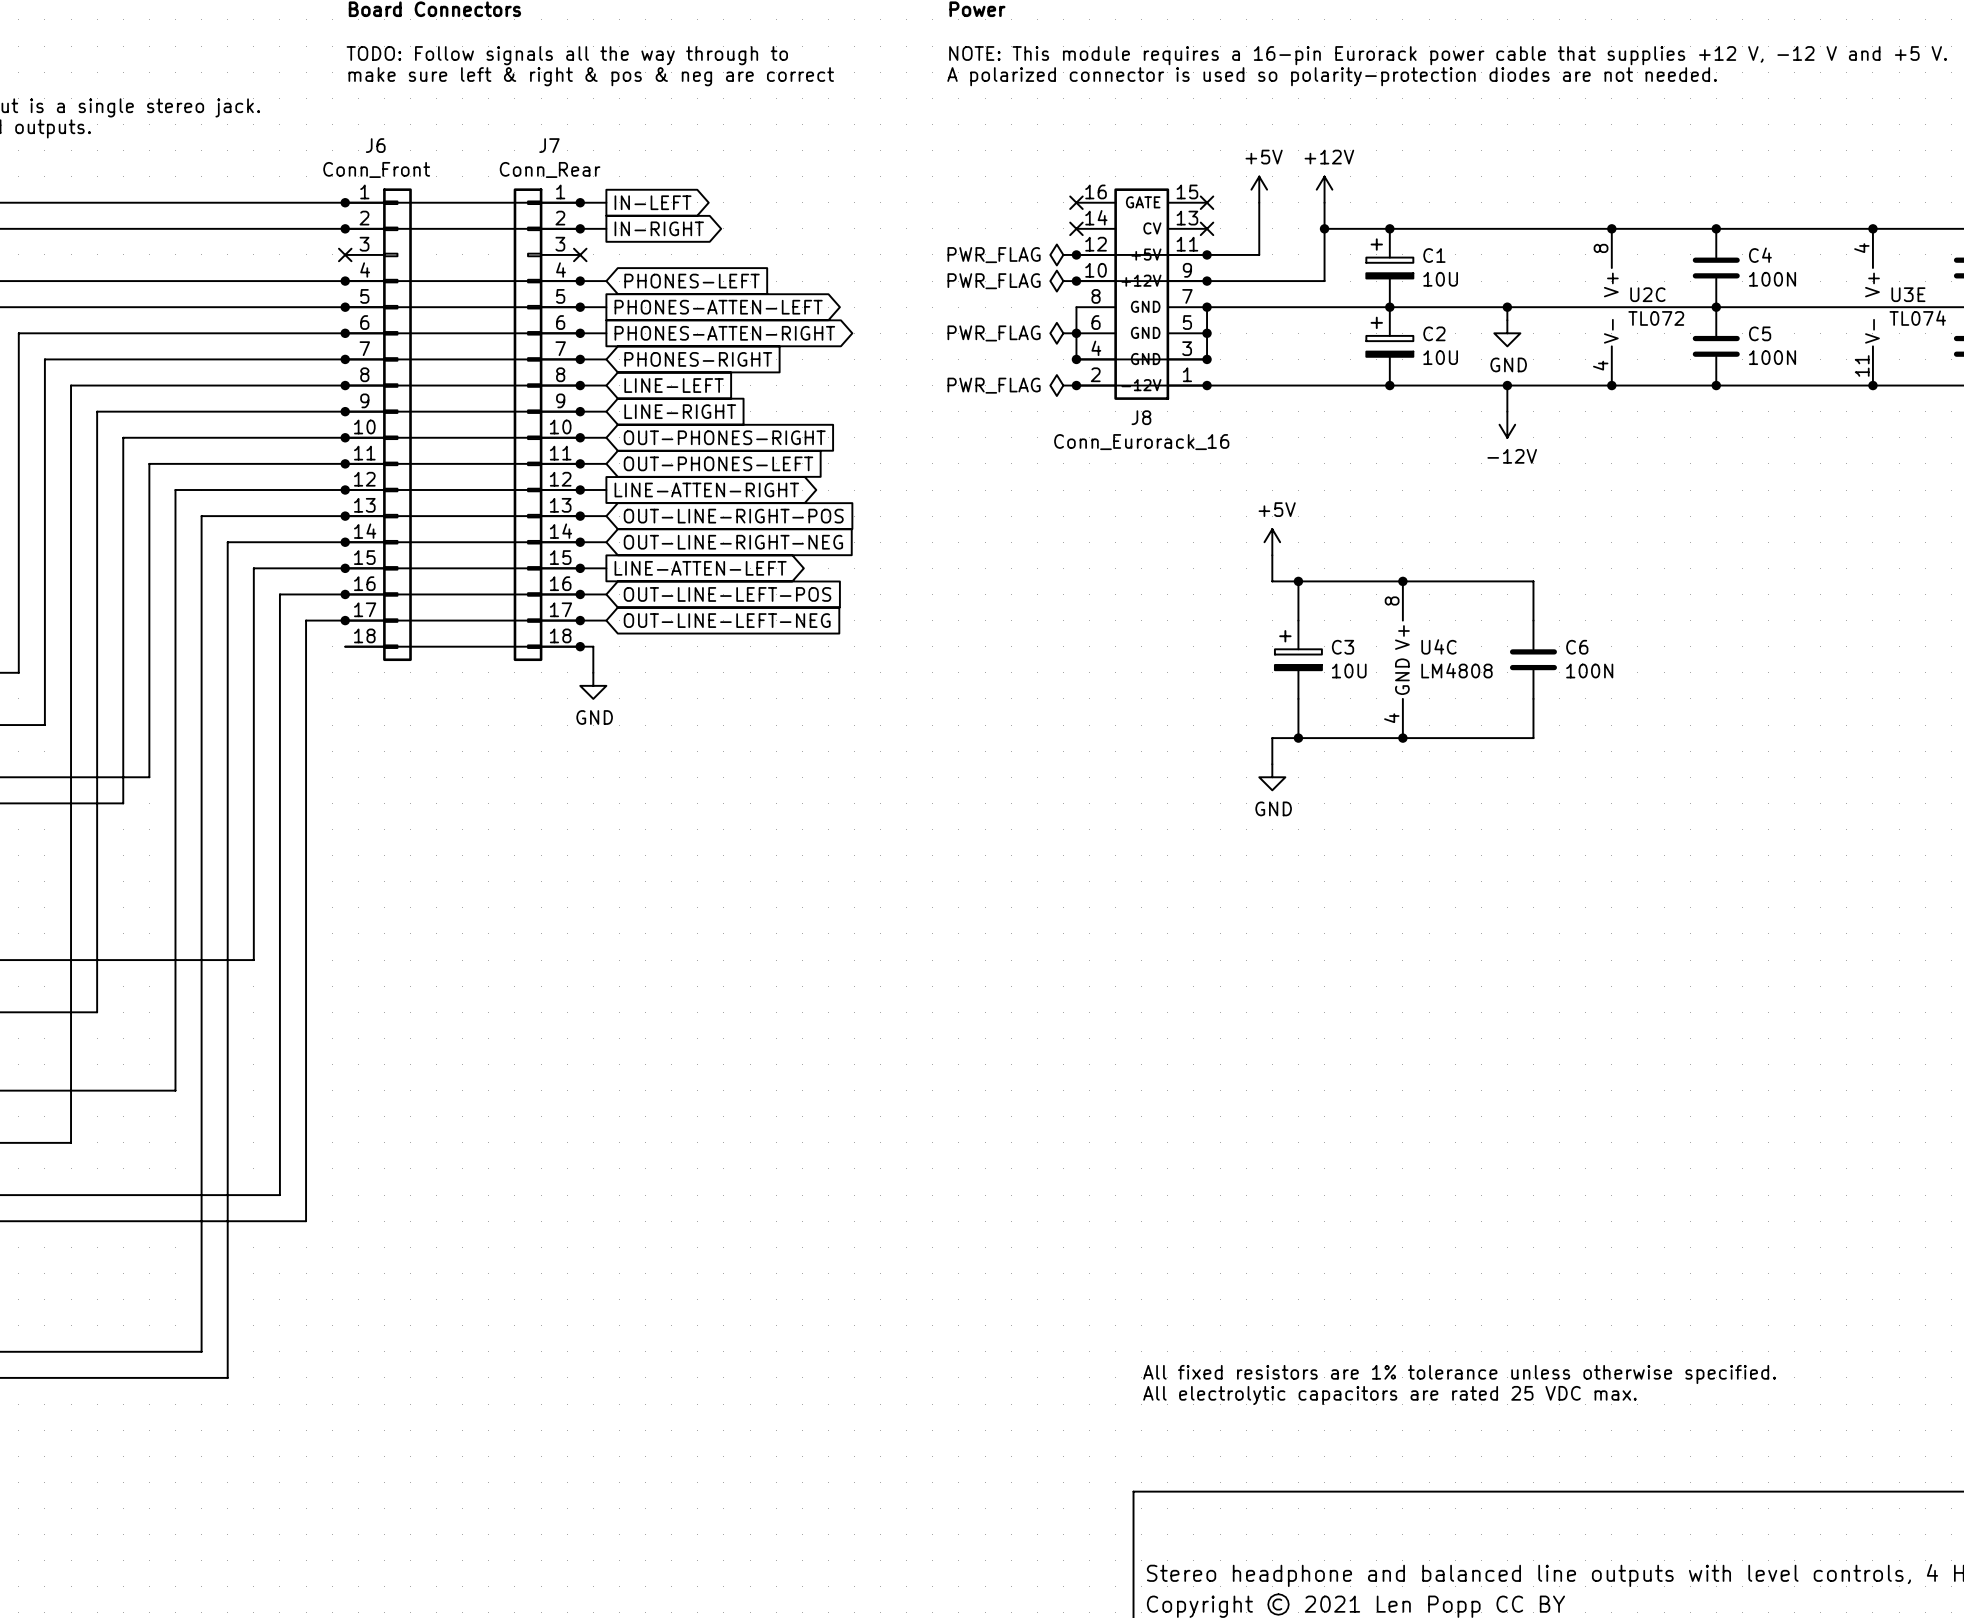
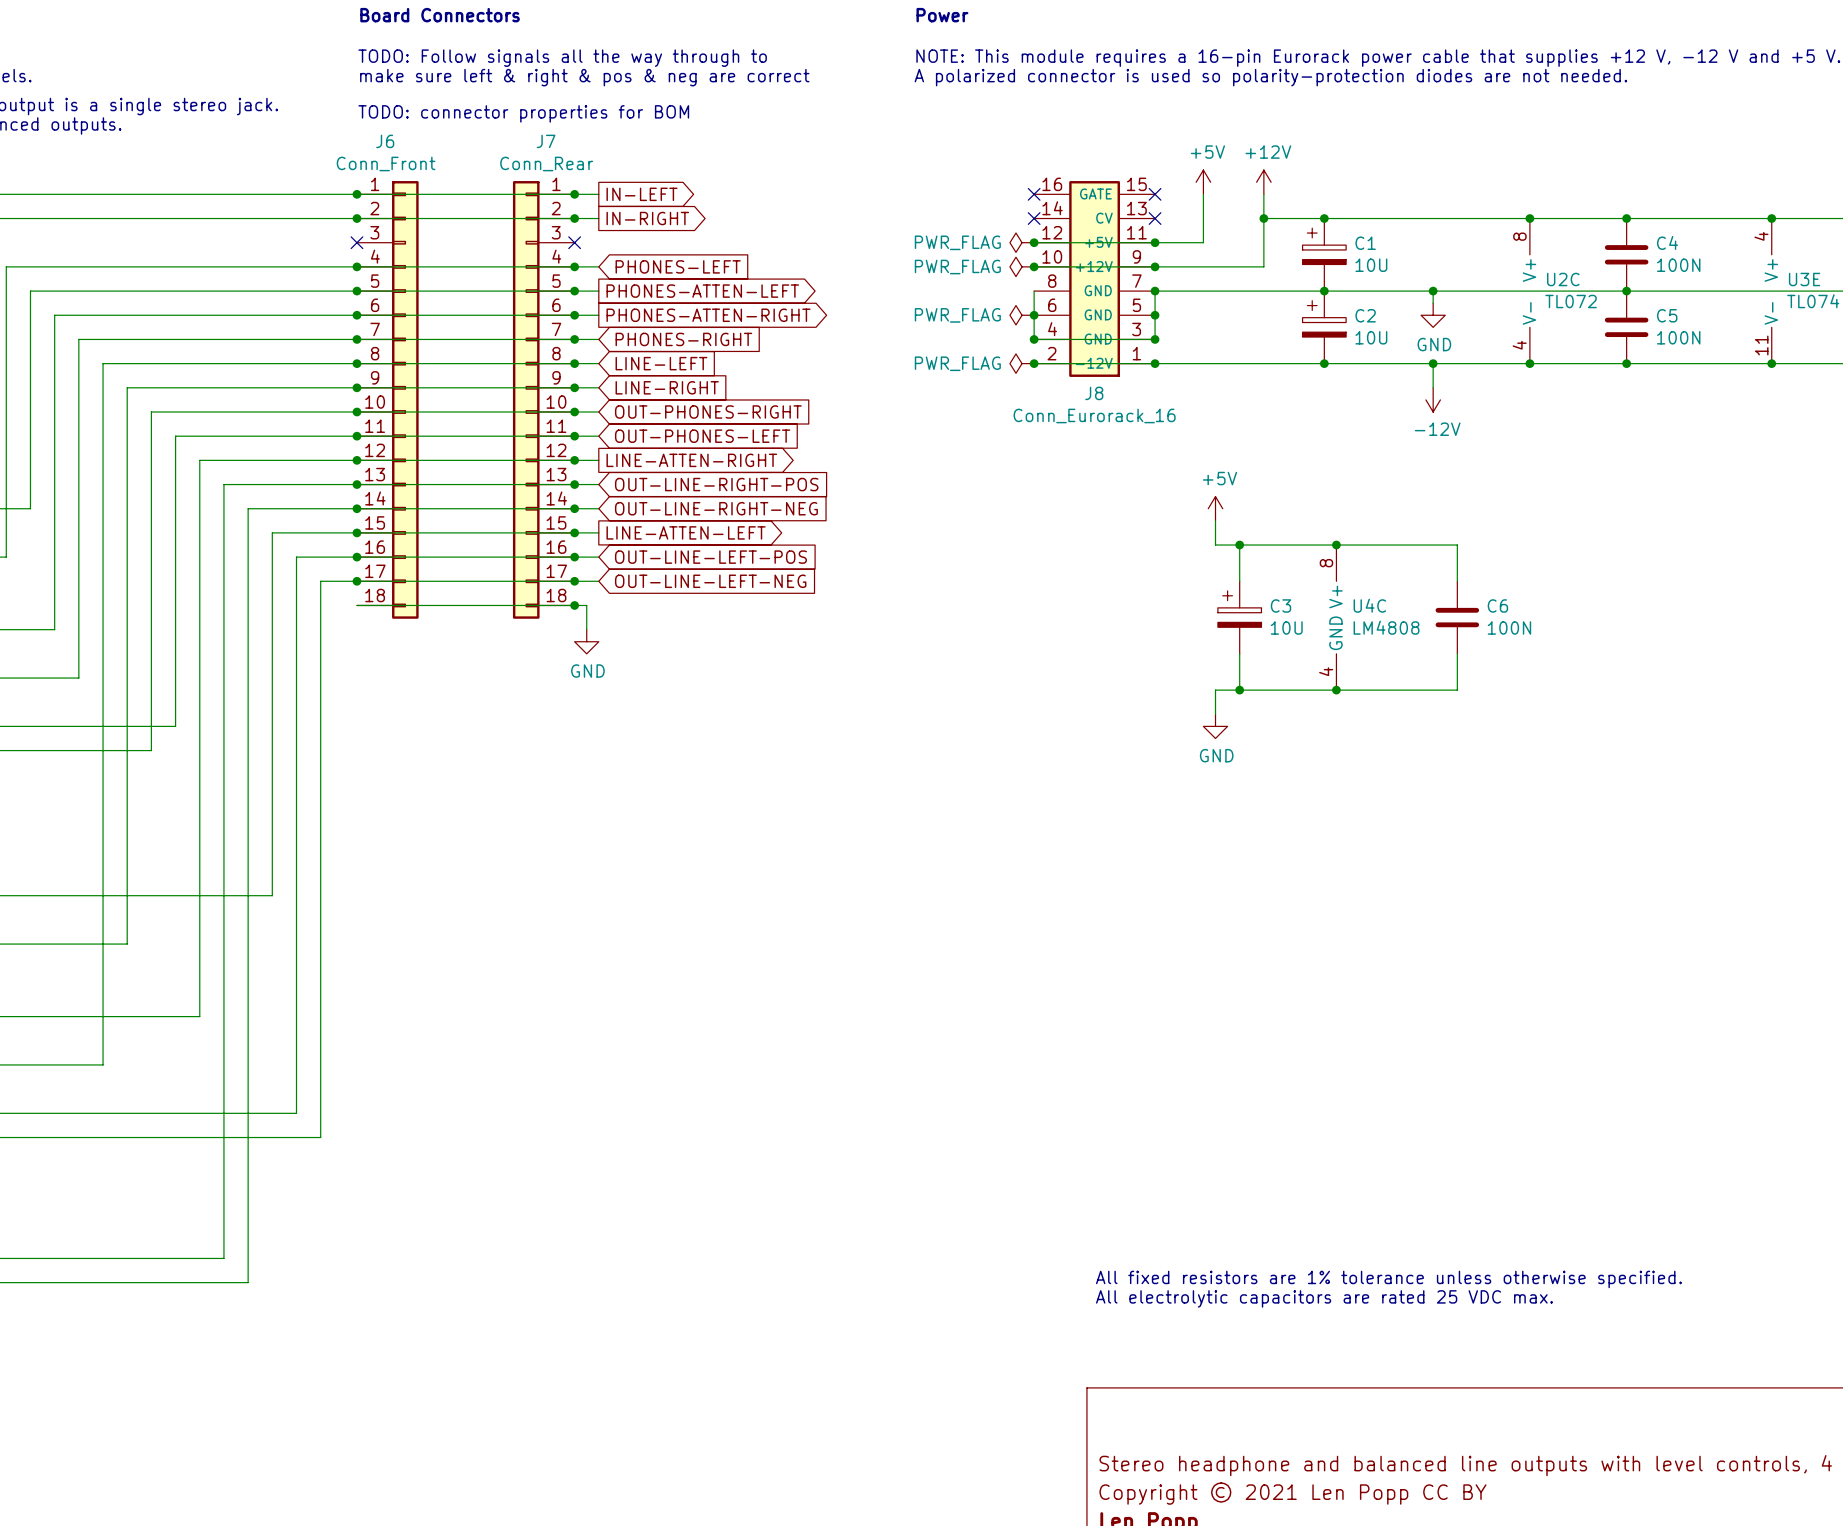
text: none -> TODO: connector properties for BOM (523, 113)

